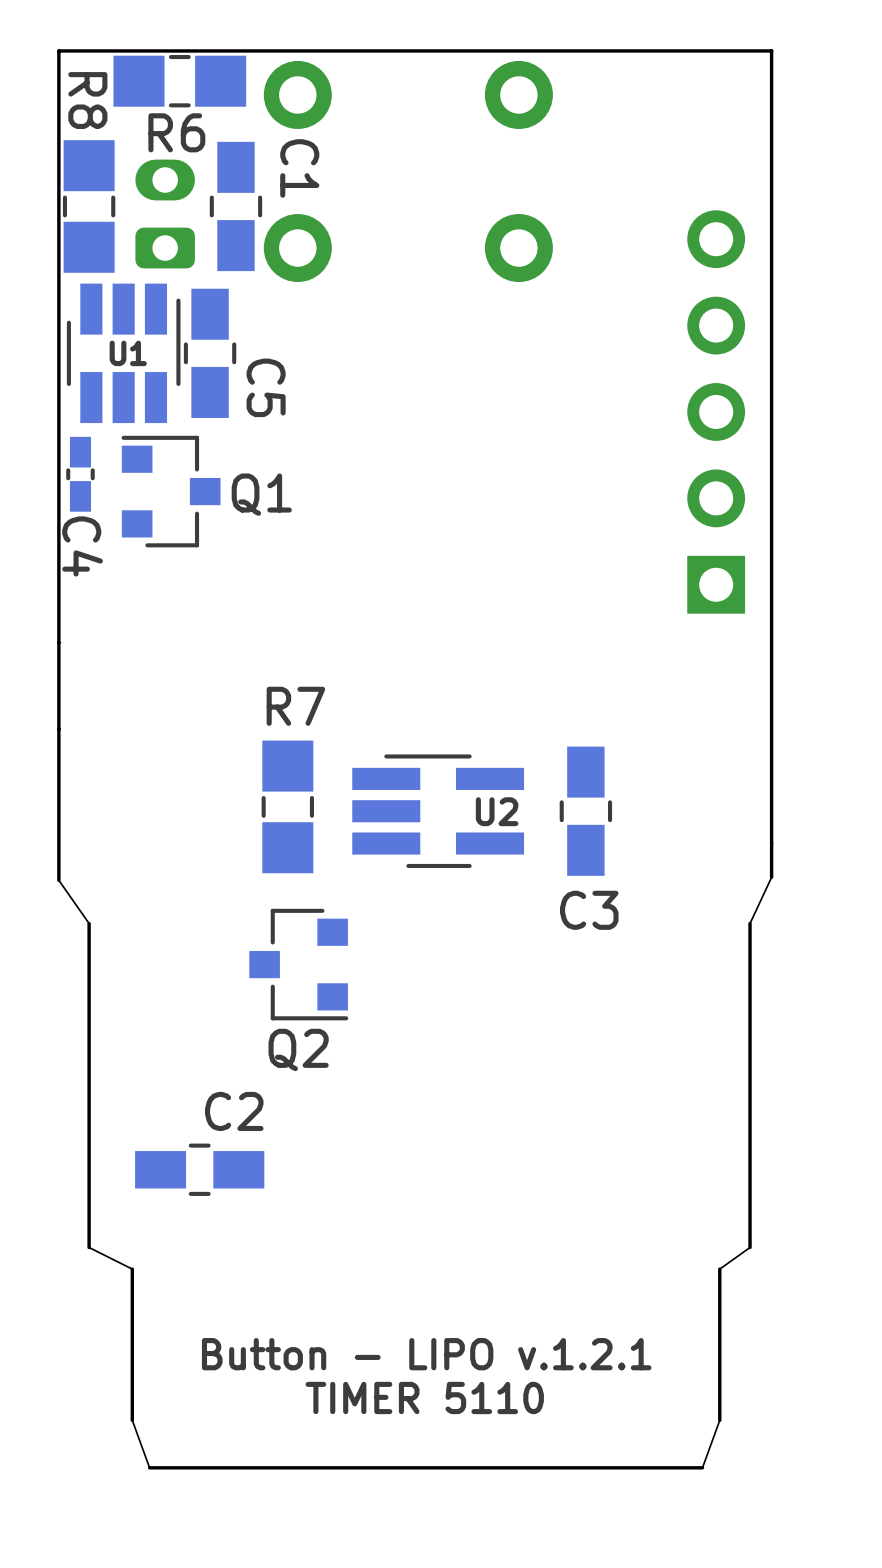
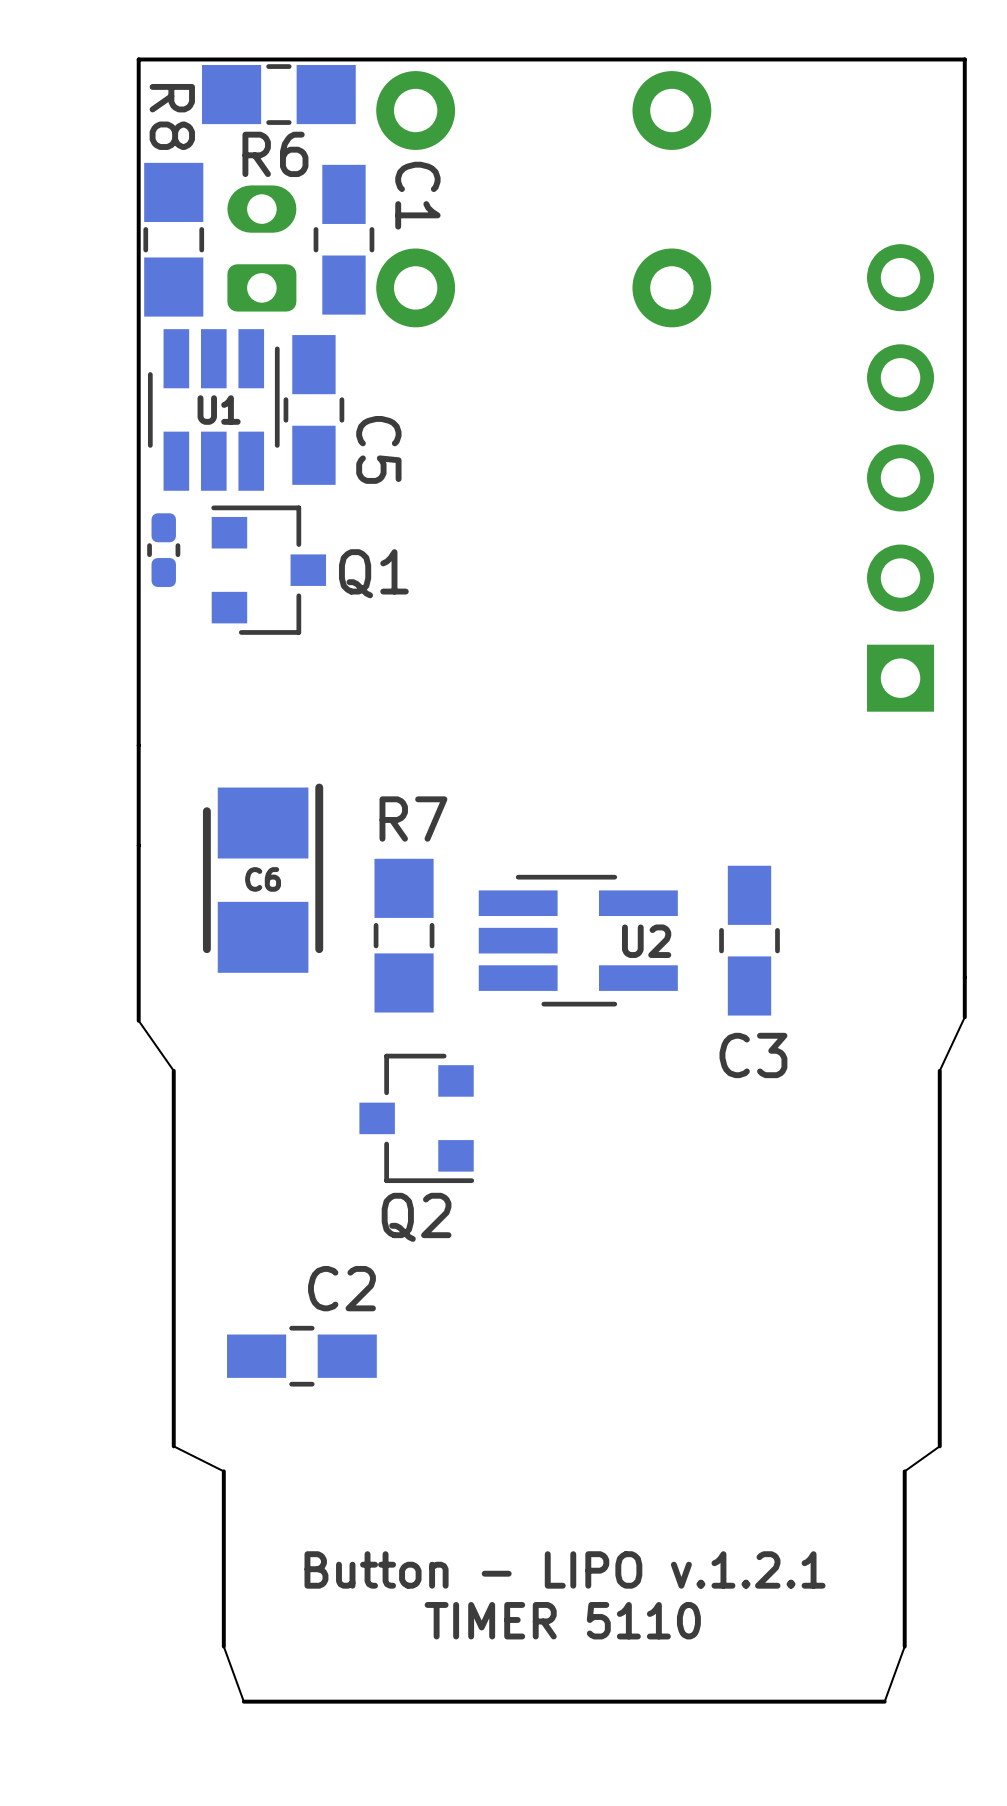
C4: (80, 474) -> none
part: none -> (163, 550)
C6: none -> (263, 878)

